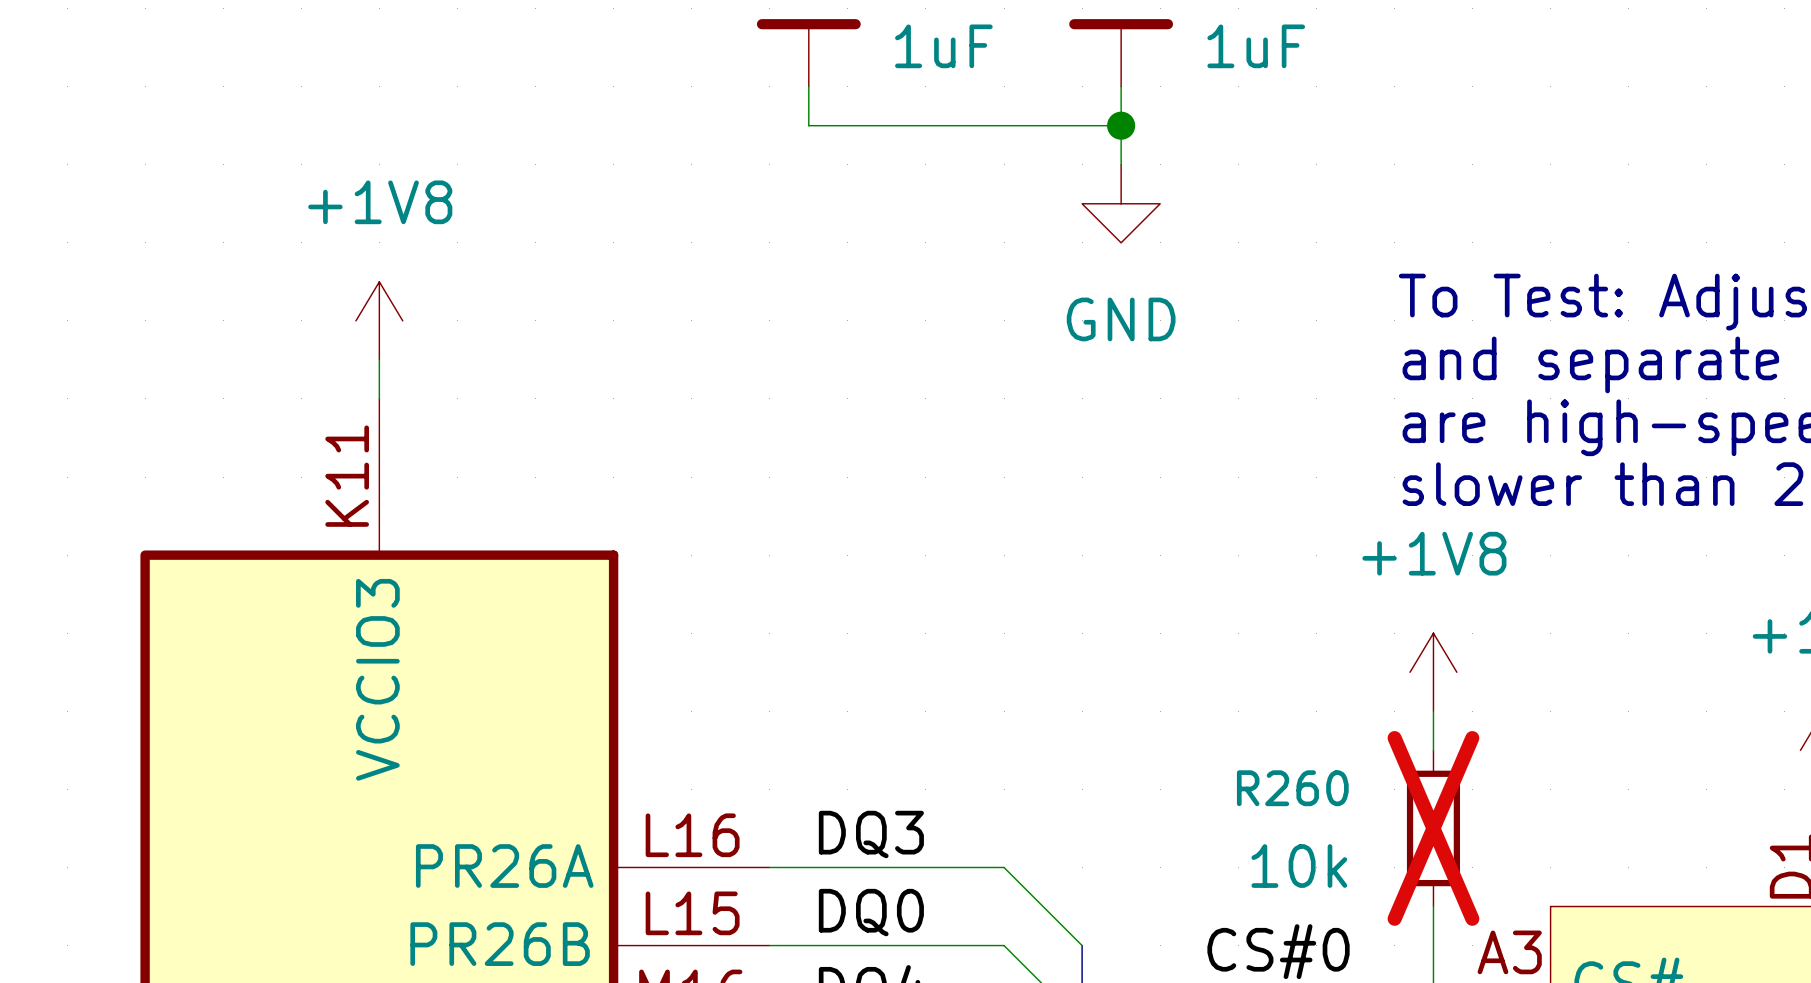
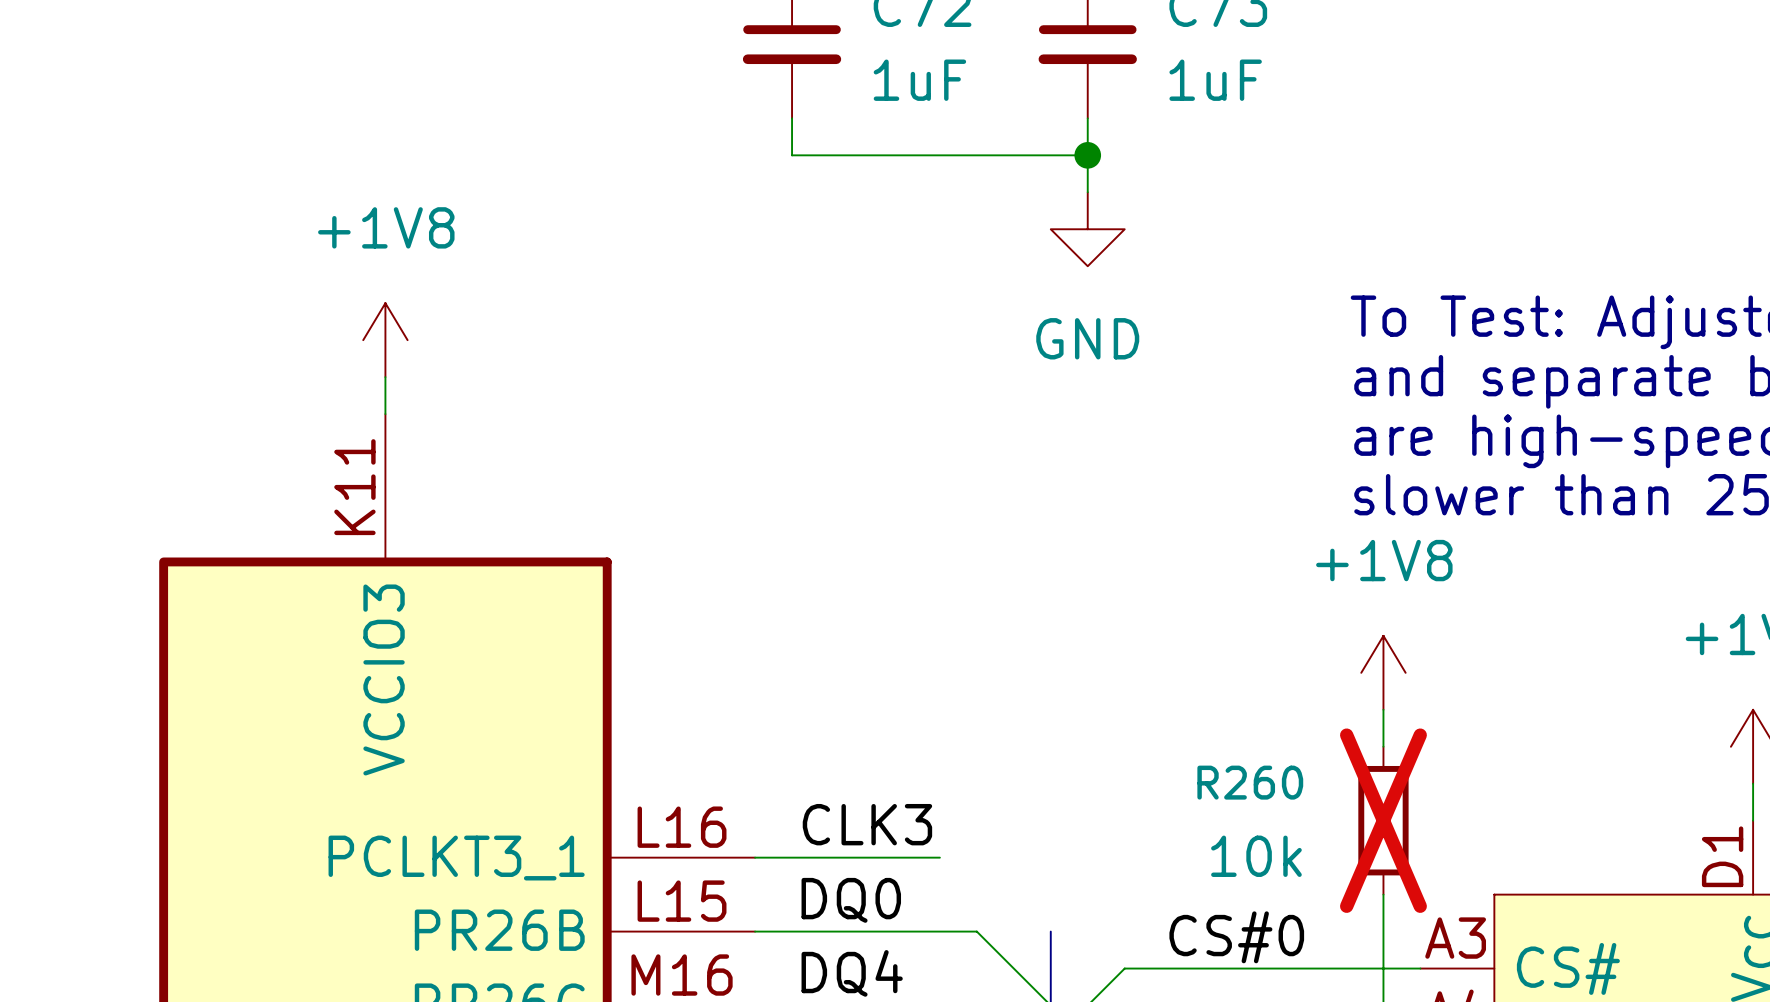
label: none -> CLK3 (867, 824)
label: DQ3 (871, 834) -> none
part pin name: PR26A (504, 866) -> PCLKT3_1 (456, 858)
wire: (964, 867) (1004, 867) (1082, 945) -> none

